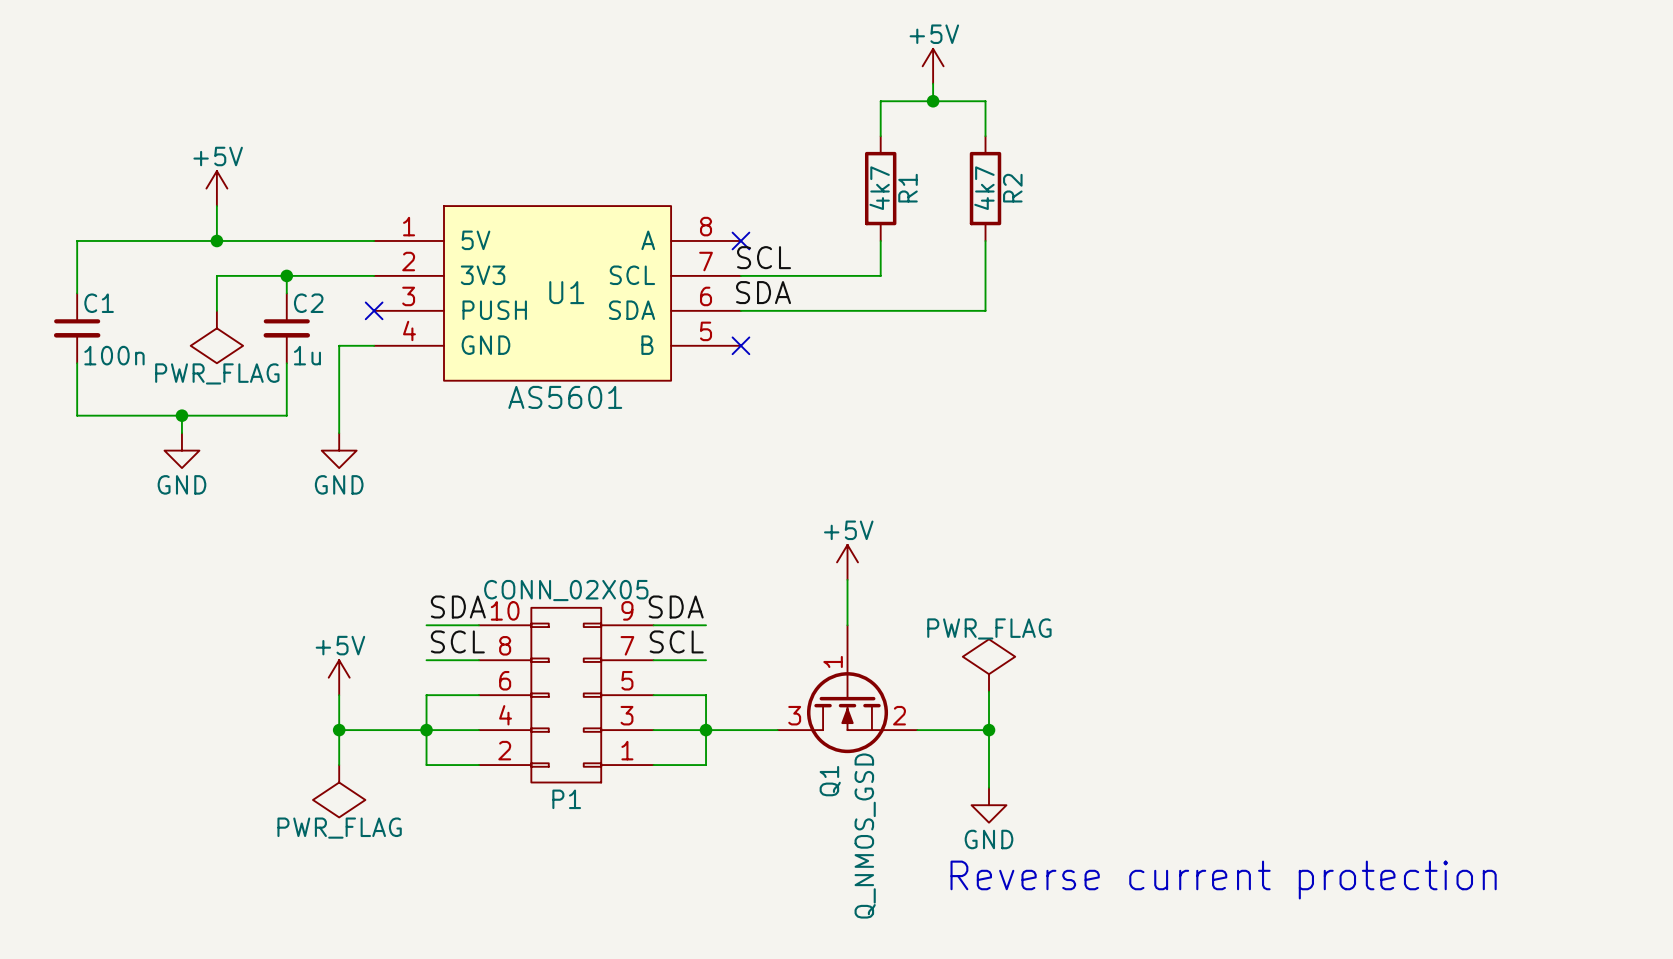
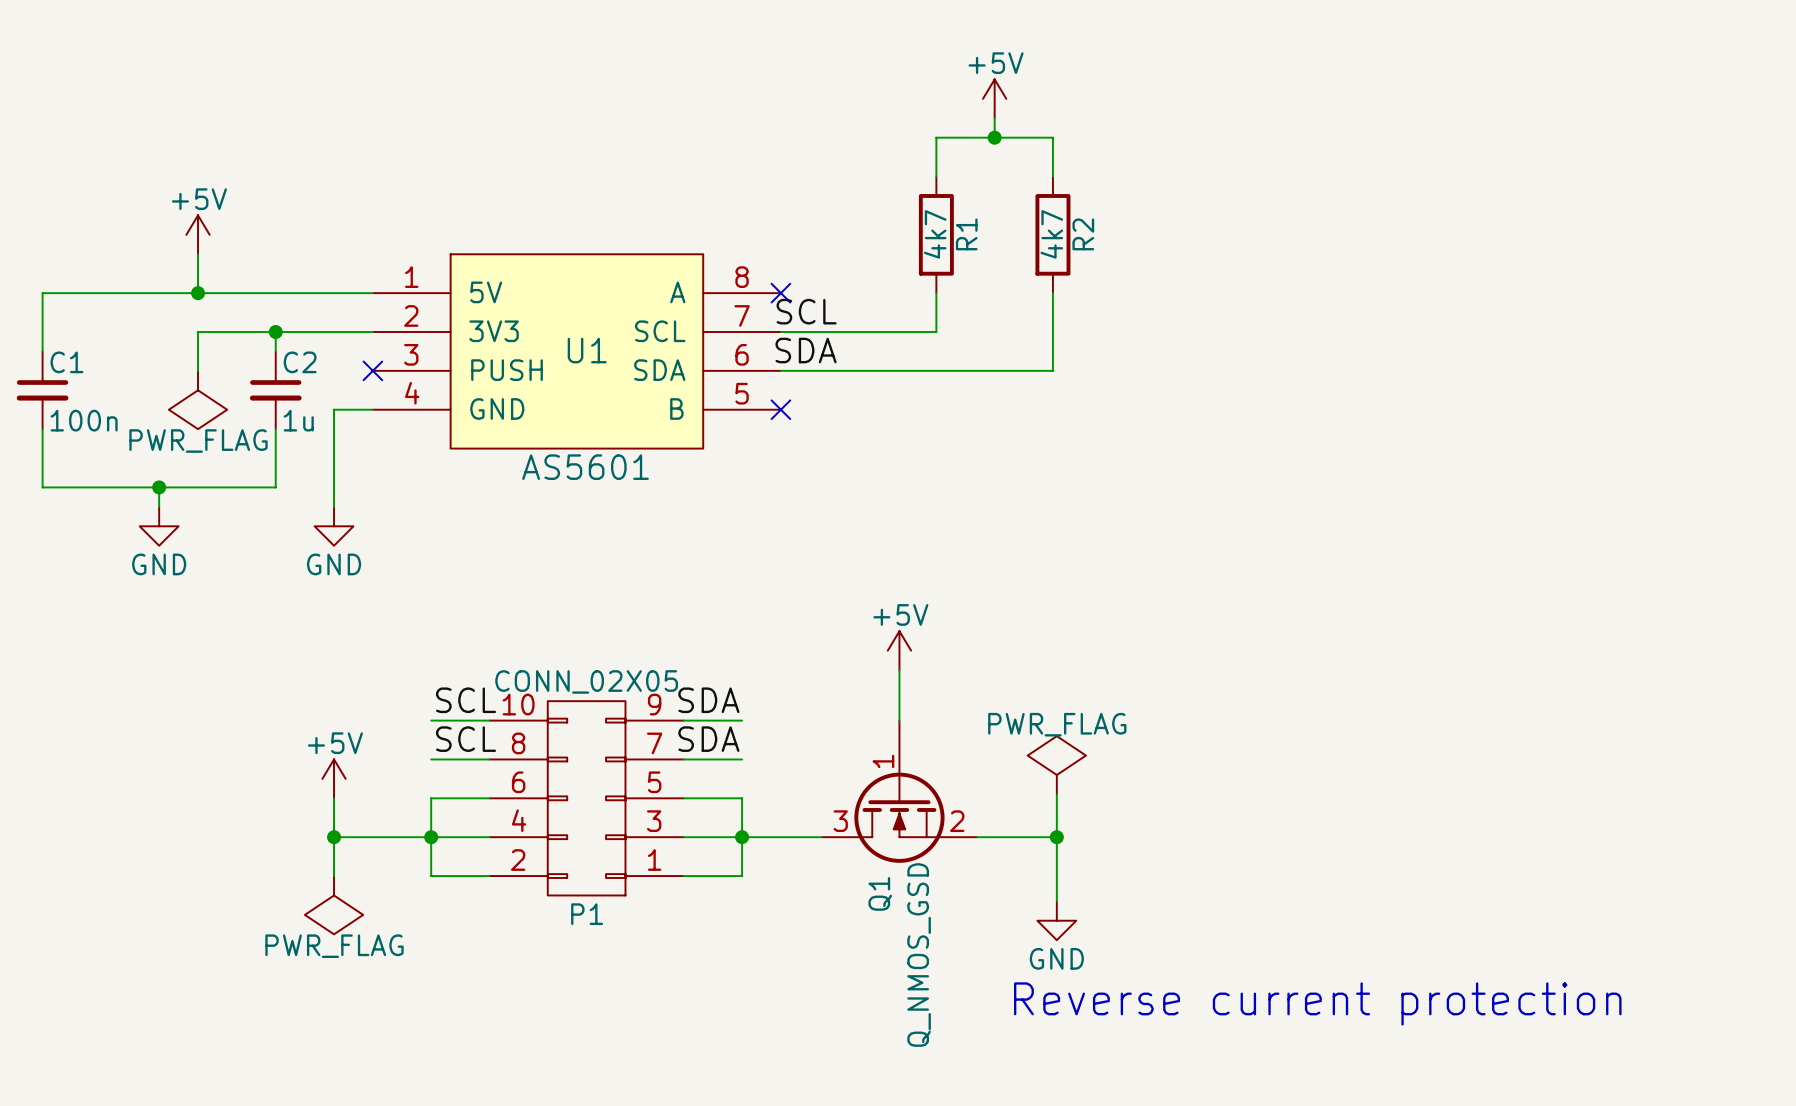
label: SDA (458, 607) -> SCL (466, 700)
label: SCL (676, 641) -> SDA (708, 739)

